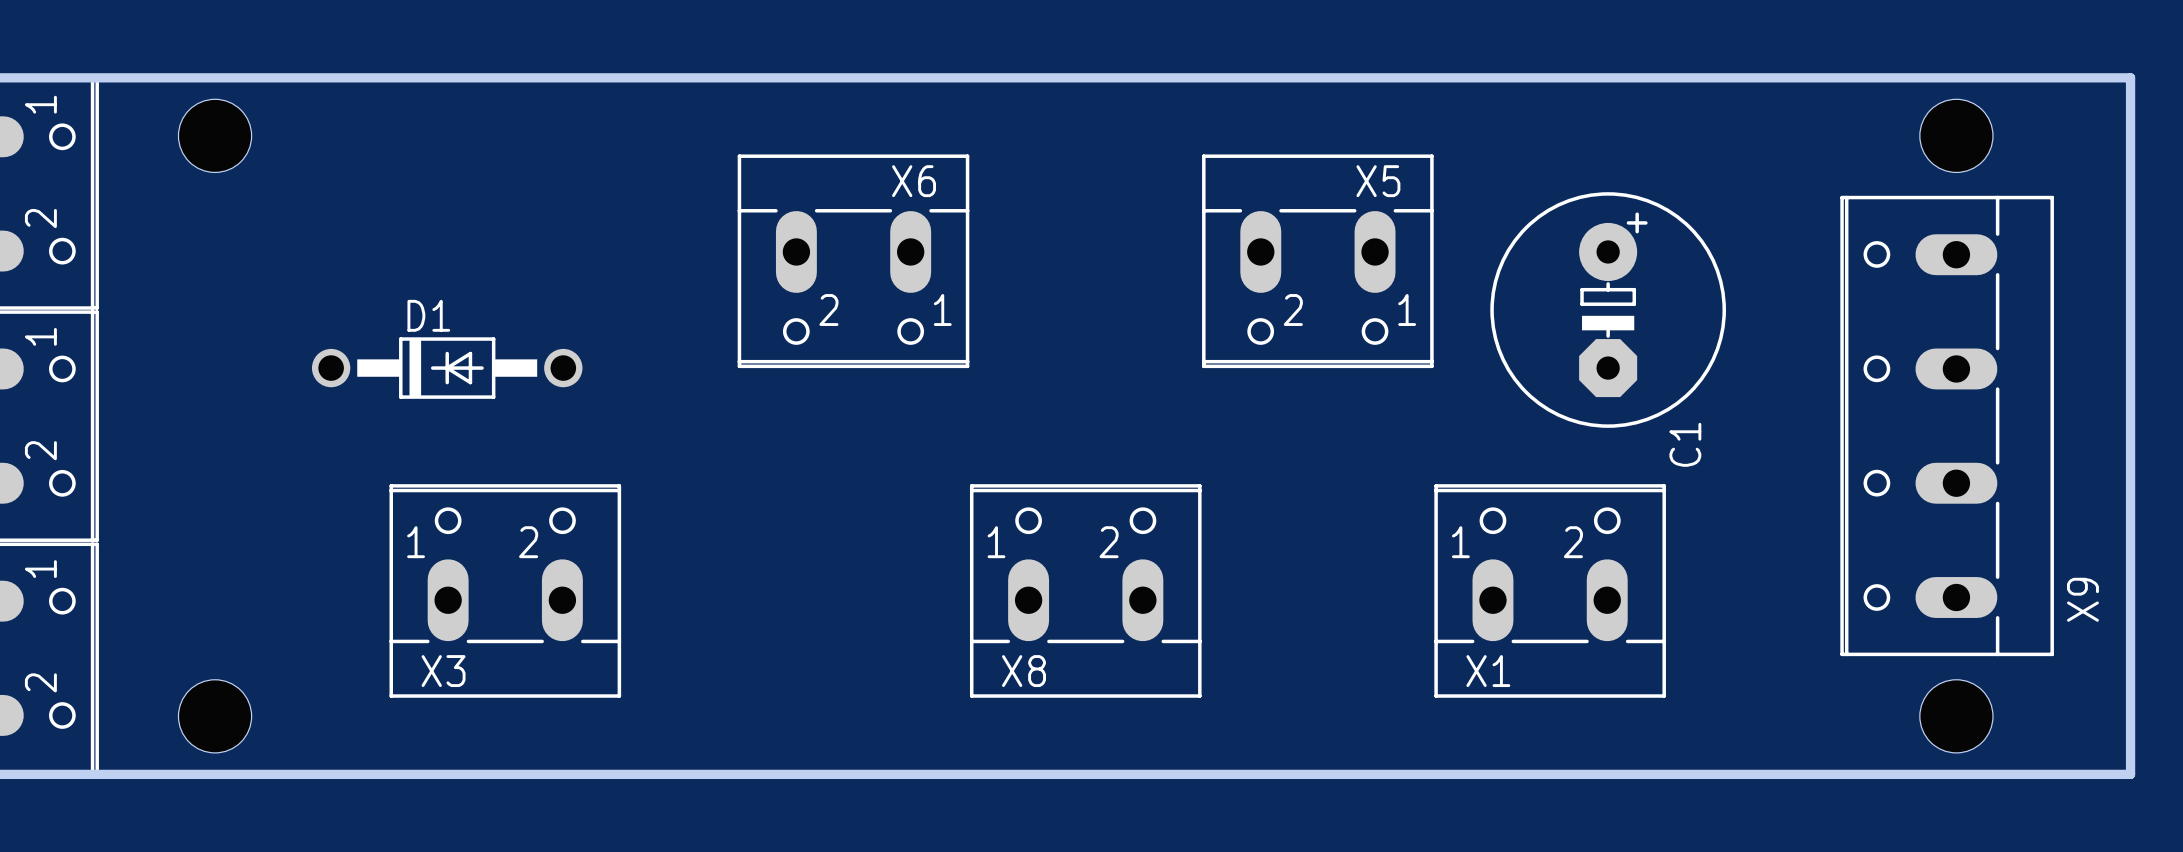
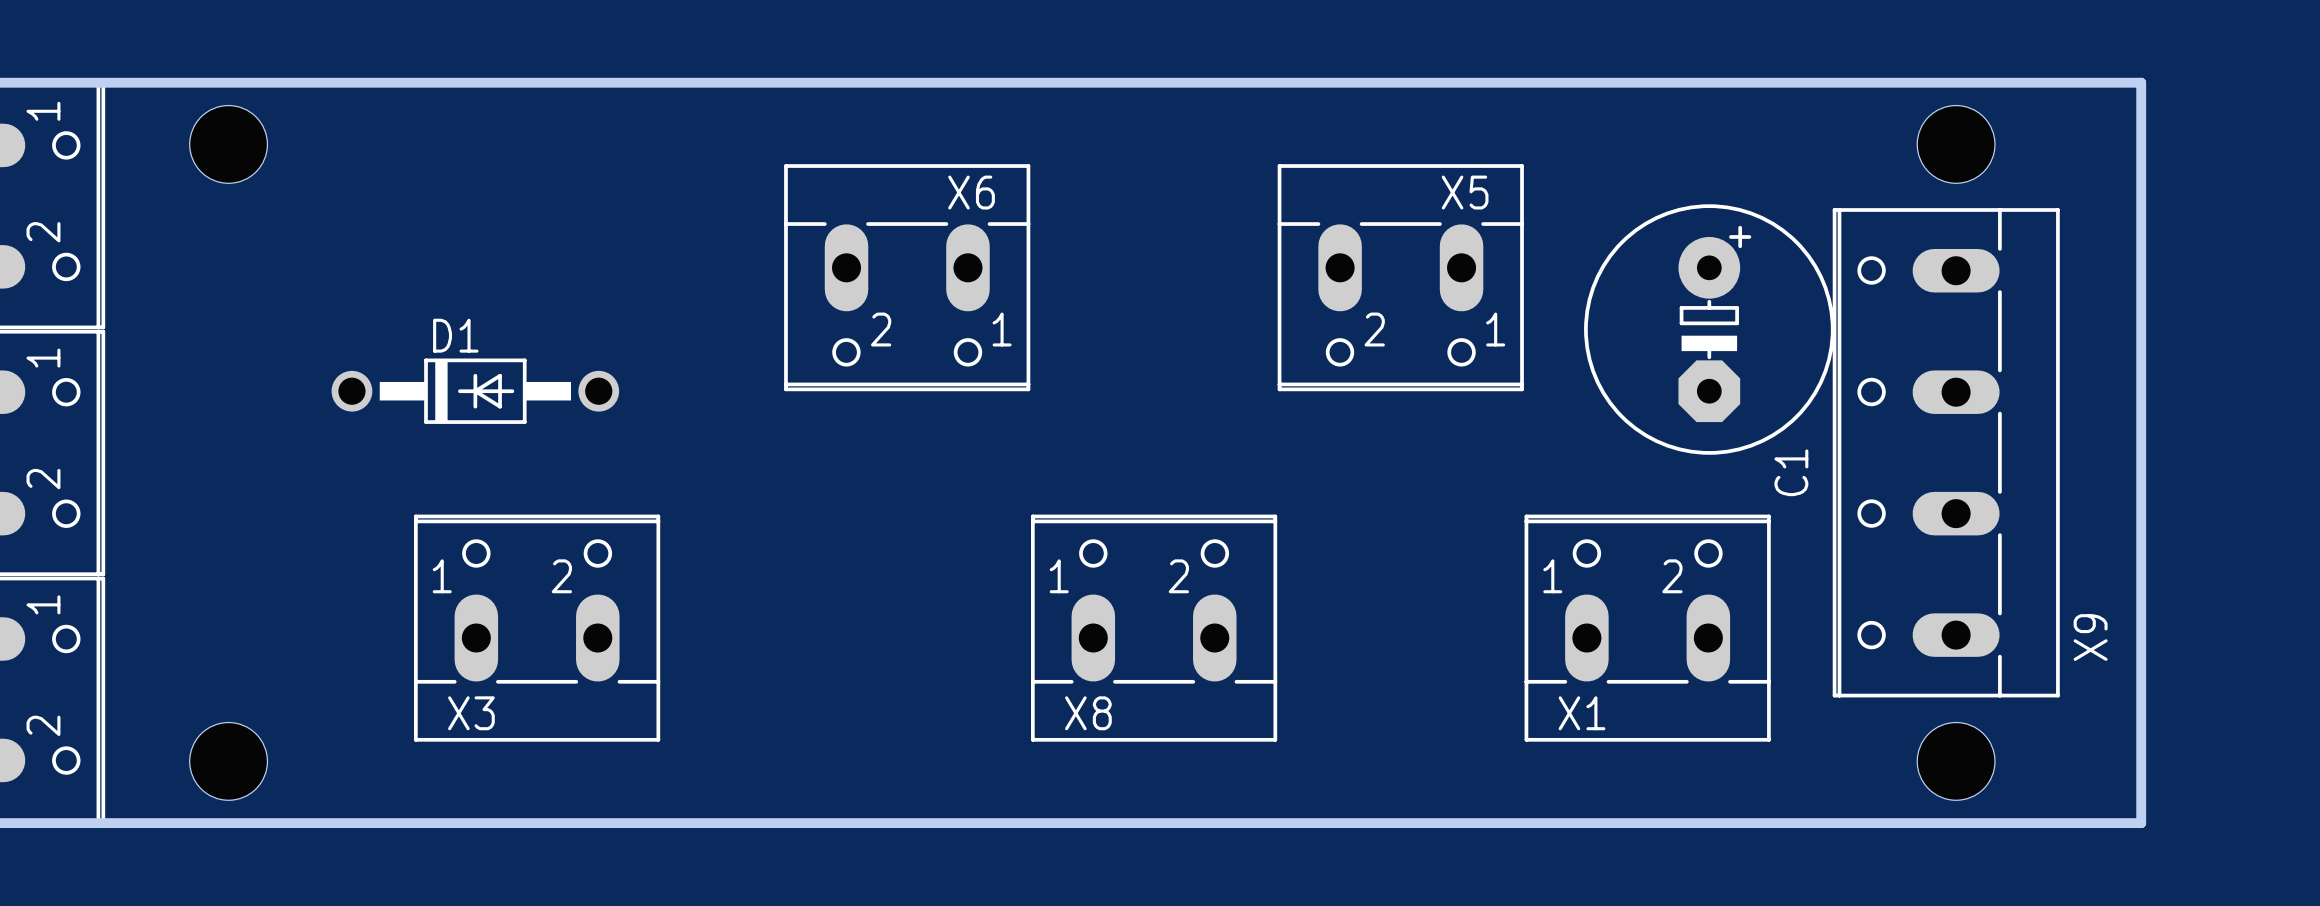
board edge: (2014, 77) (2130, 77) (2130, 774) (2014, 774) -> (2141, 82) (2141, 823)
hole position: (1956, 135) -> (1956, 144)
X9 position: (1947, 425) -> (1946, 452)
hole position: (1956, 716) -> (1956, 761)

